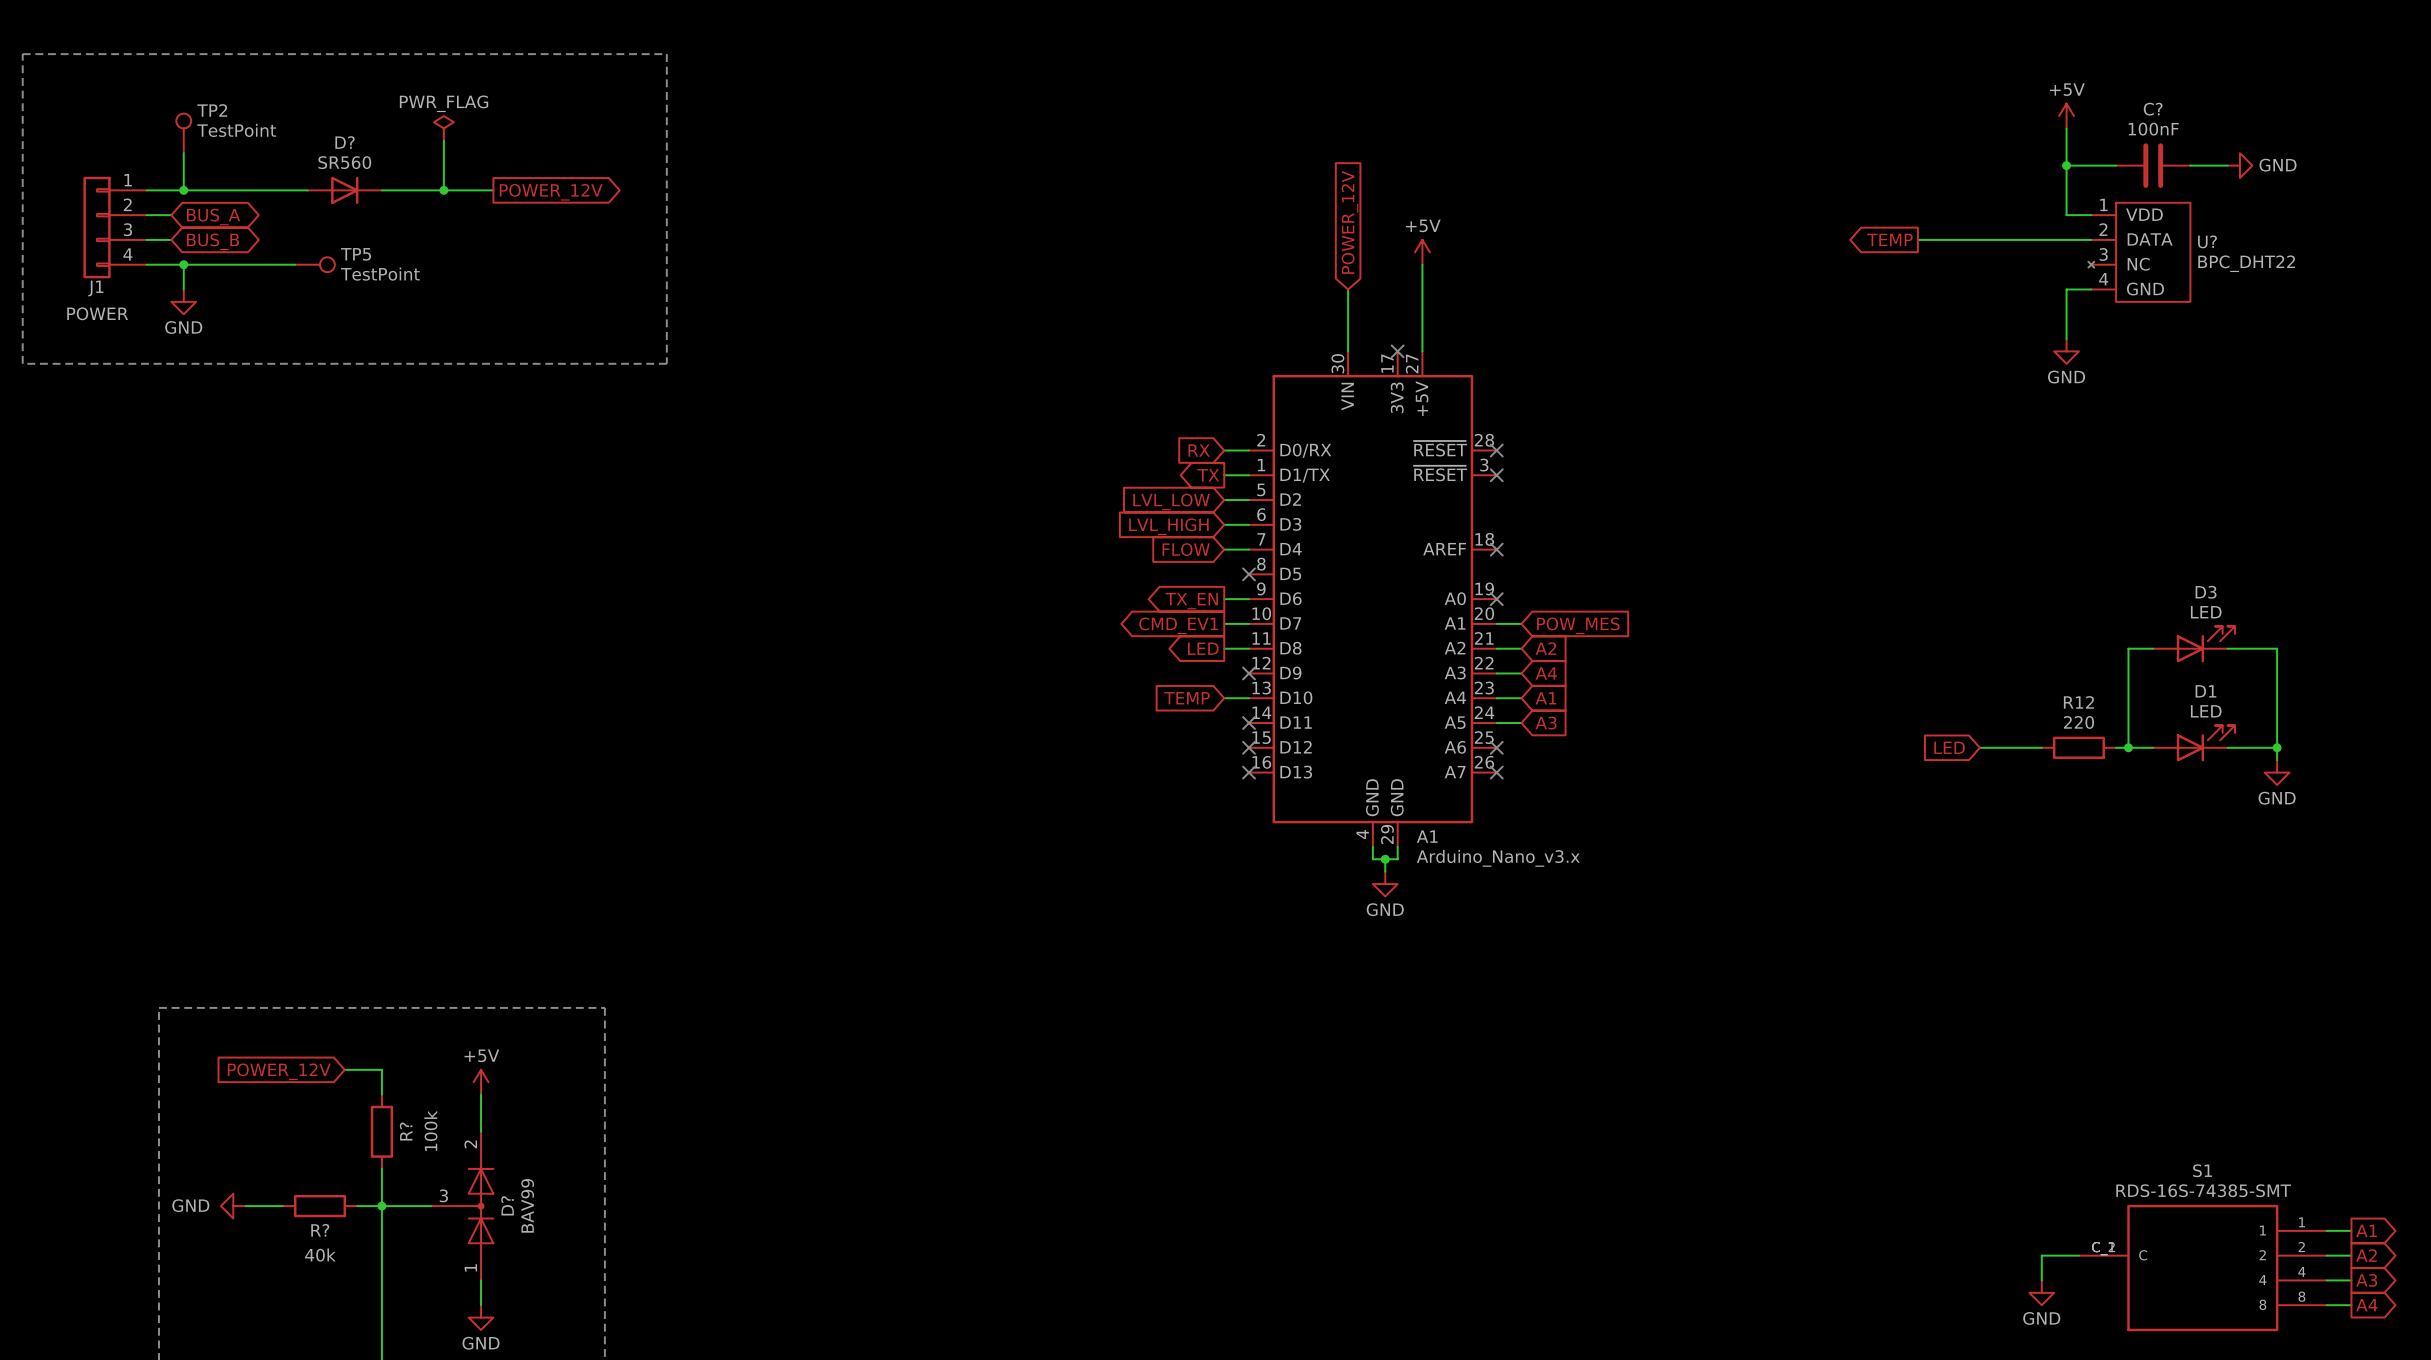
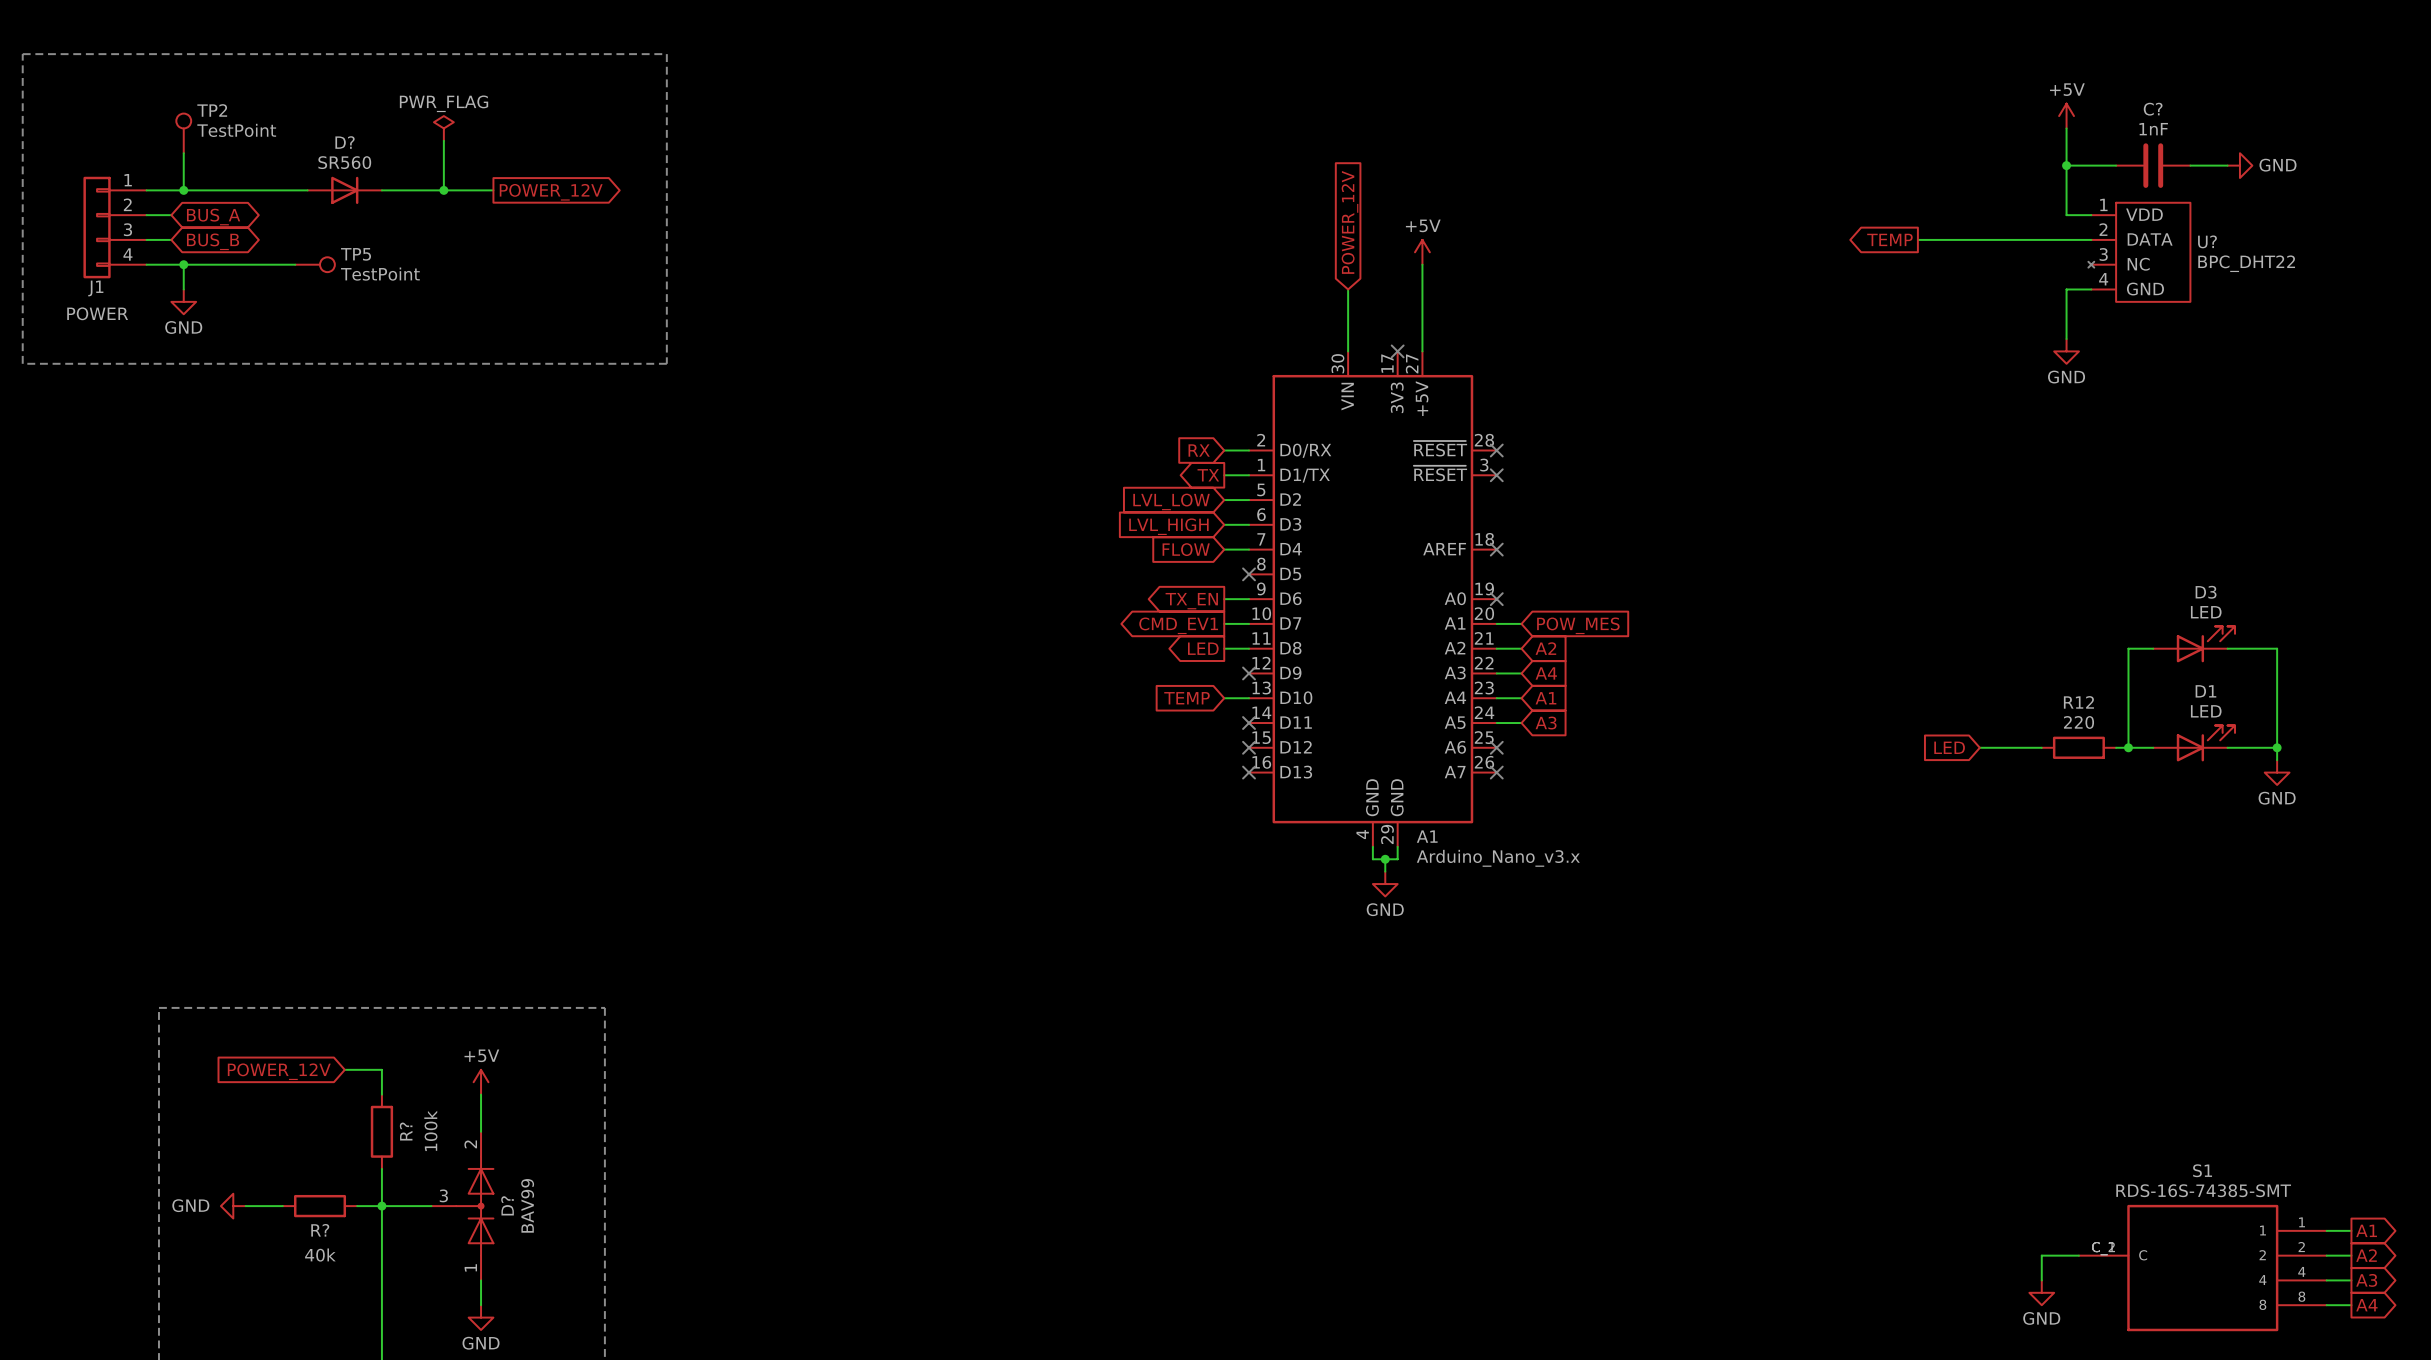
C? value: 100nF (2153, 129) -> 1nF (2153, 129)

